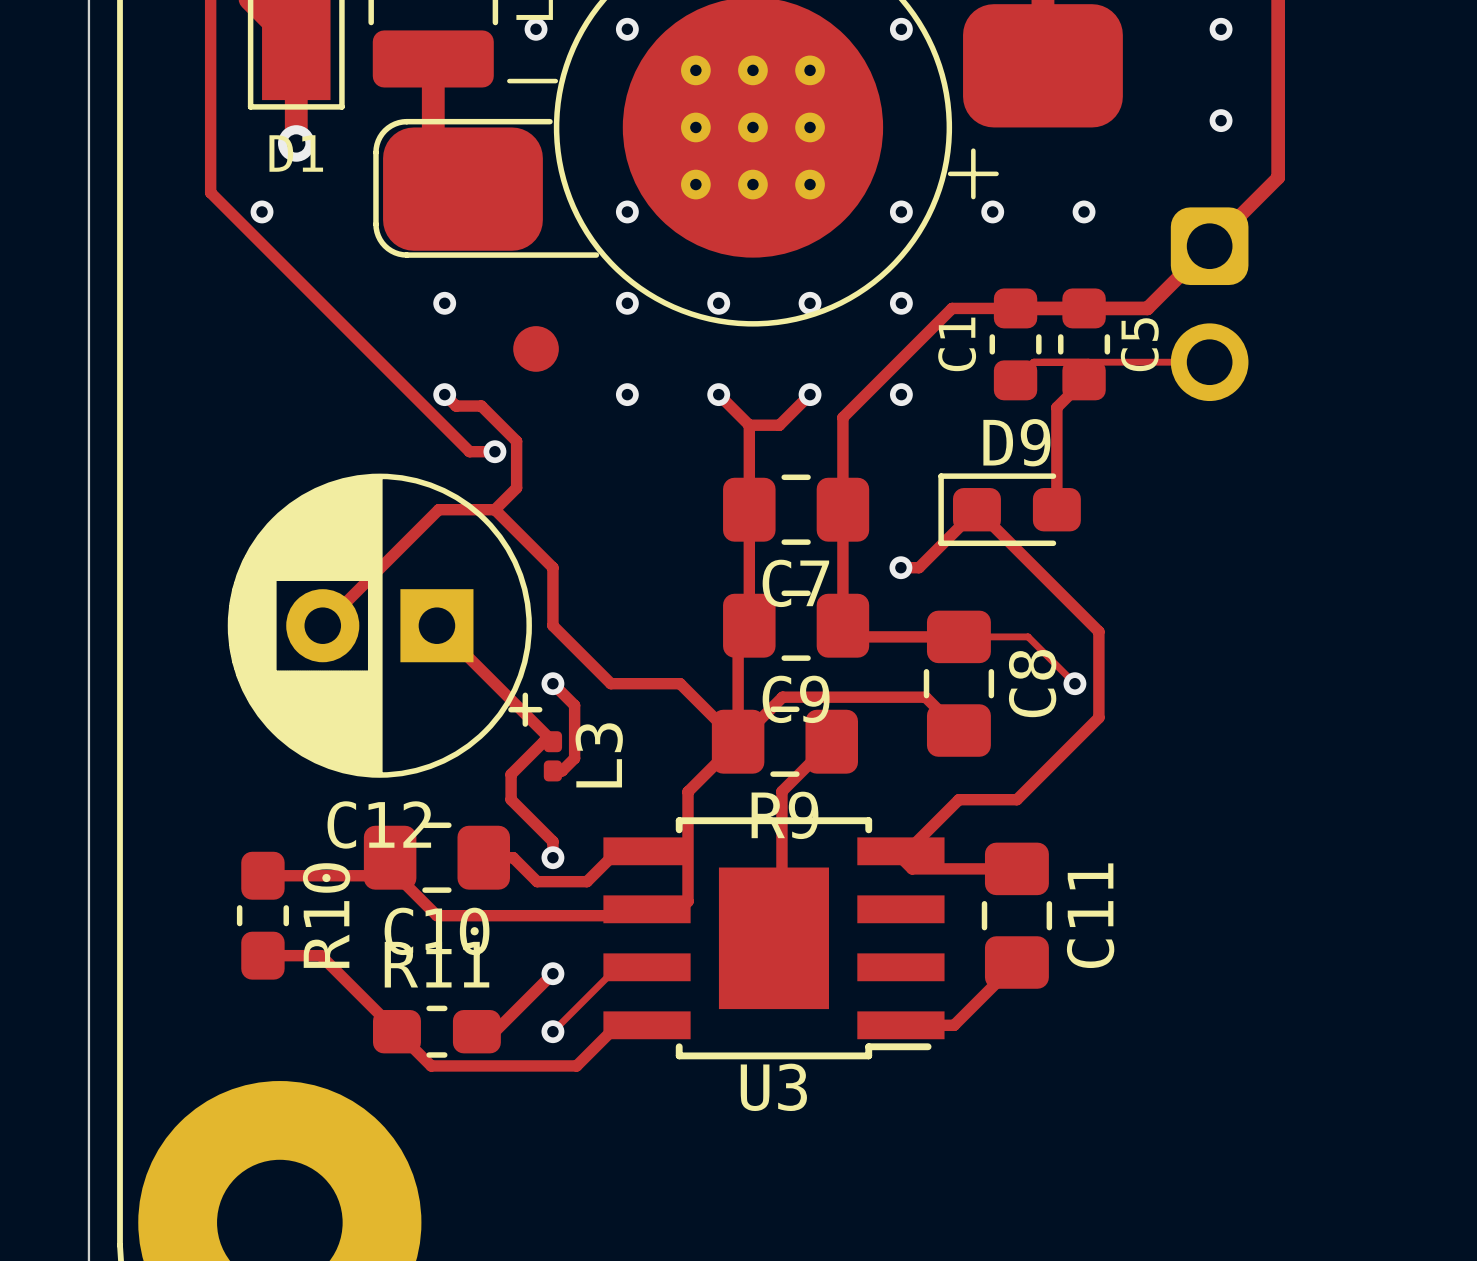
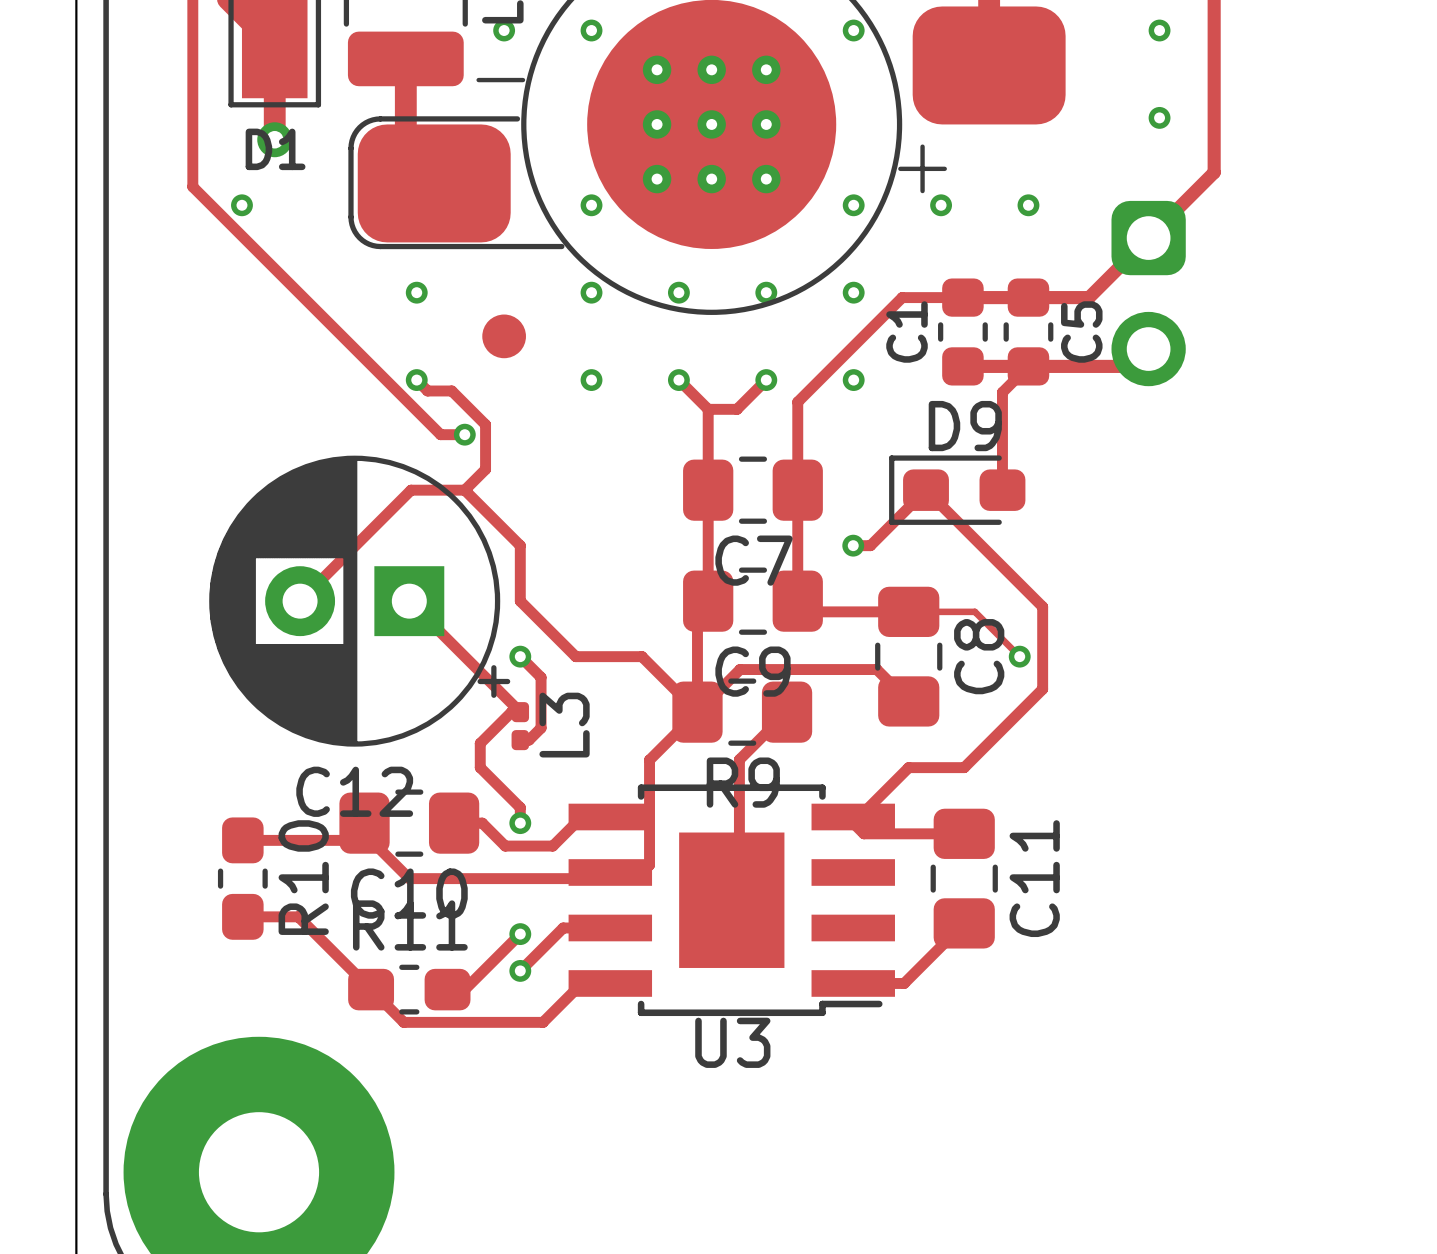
track: (1209, 362) (1033, 362) (1015, 380) -> (1131, 366) (962, 366)
track: (617, 967) (552, 1031) -> (581, 927) (563, 927) (520, 970)
via position: (552, 1031) -> (520, 970)

